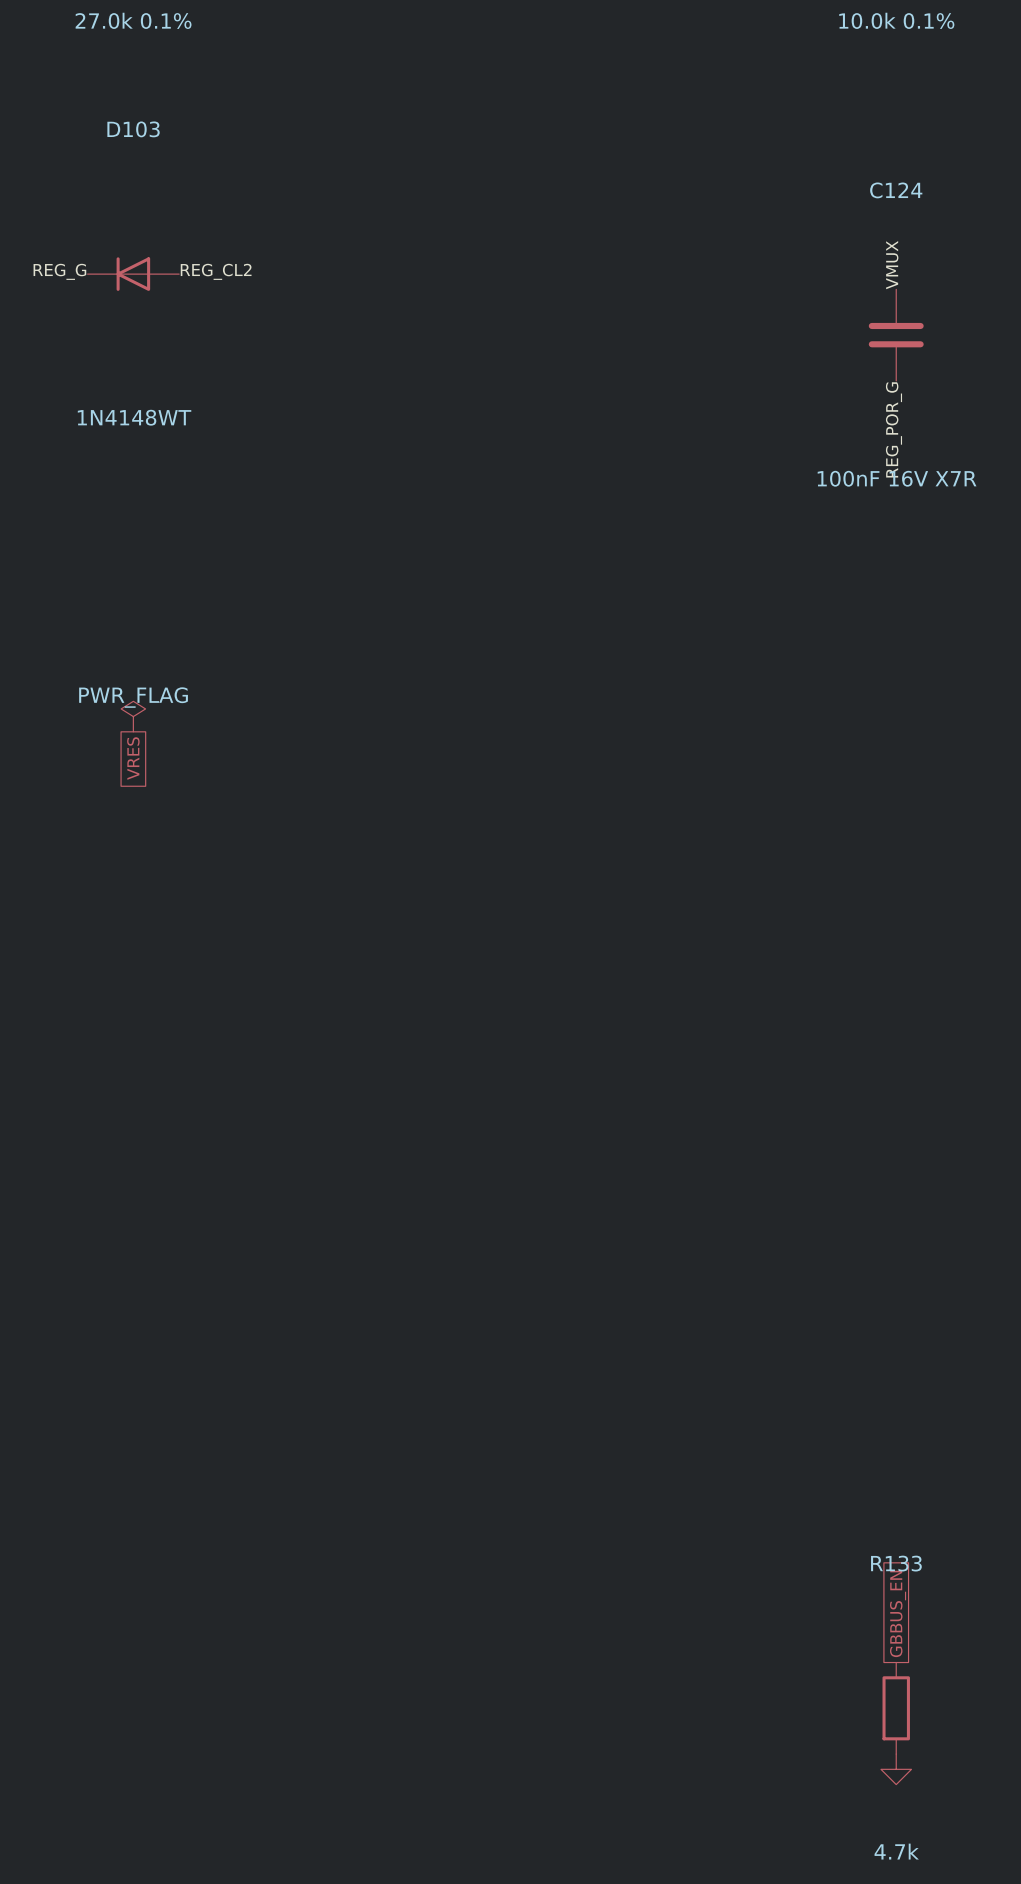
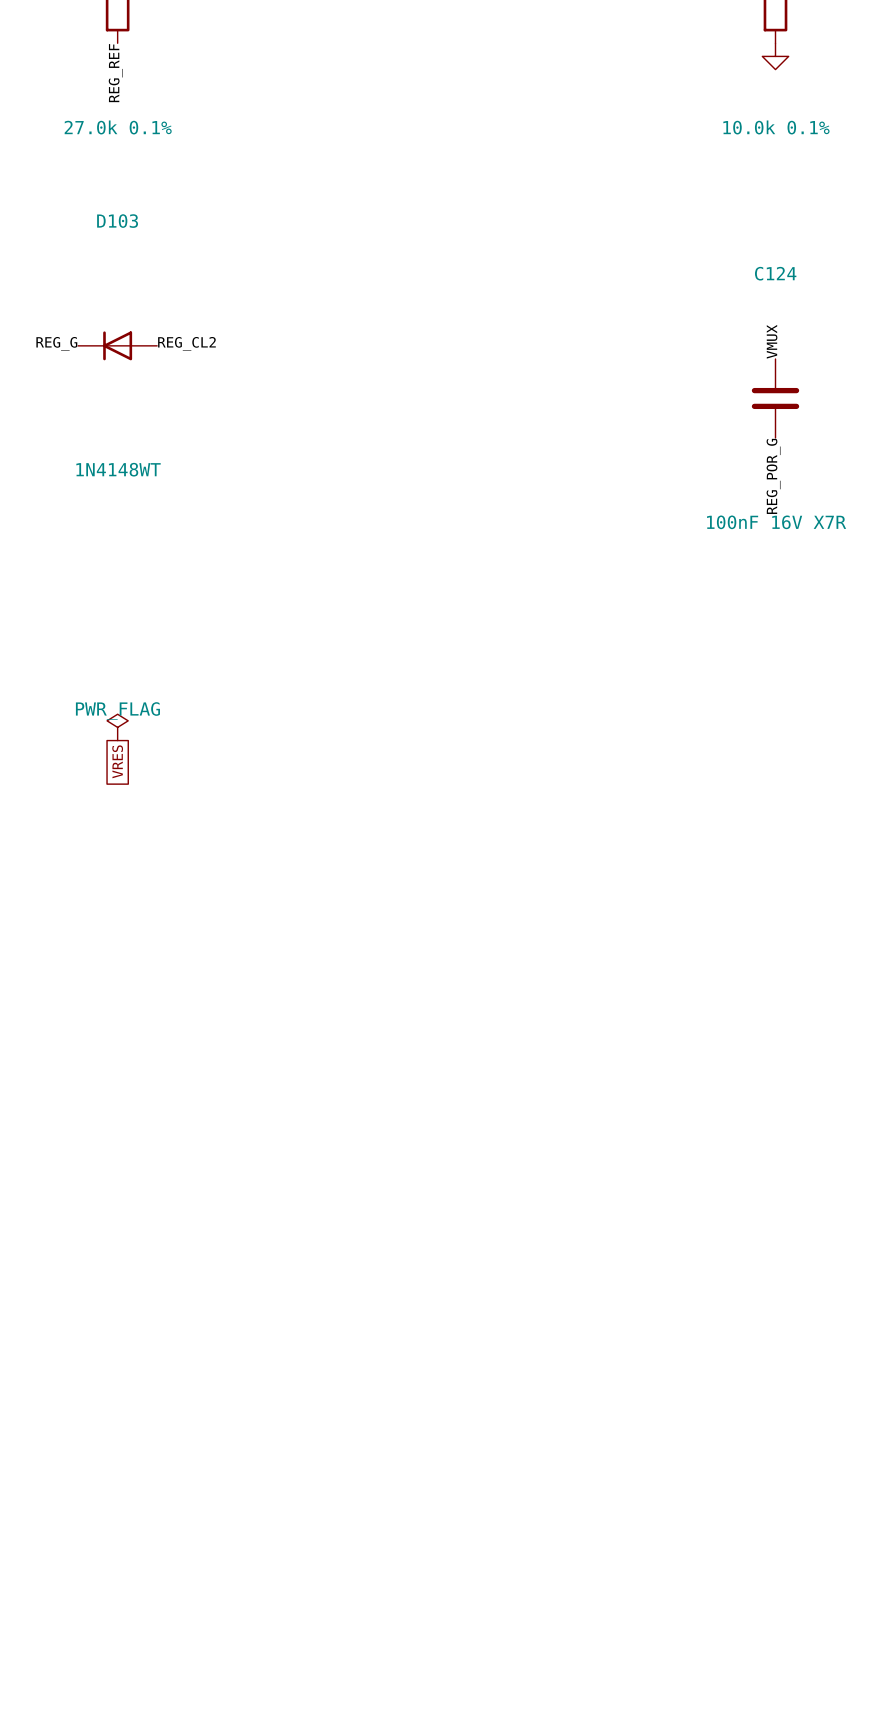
global label: GBBUS_EN (898, 1613) -> none
R133: 4.7k (896, 1708) -> none
power symbol: (896, 1769) -> none

